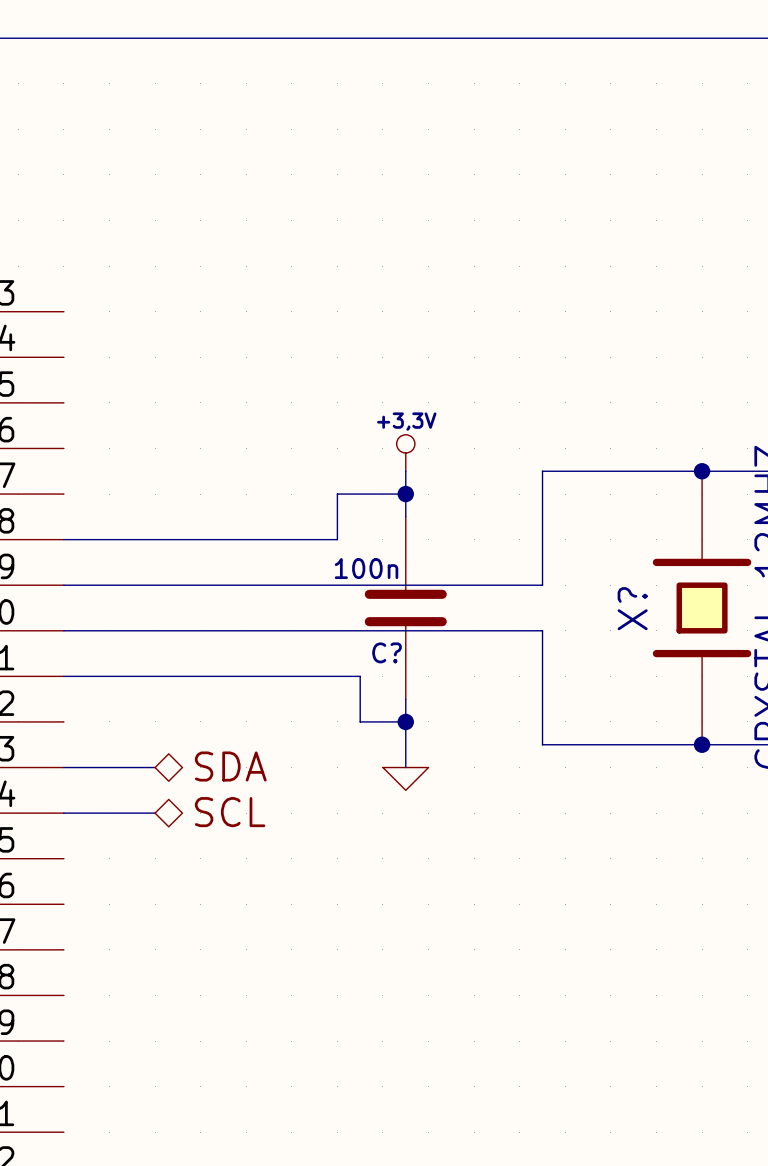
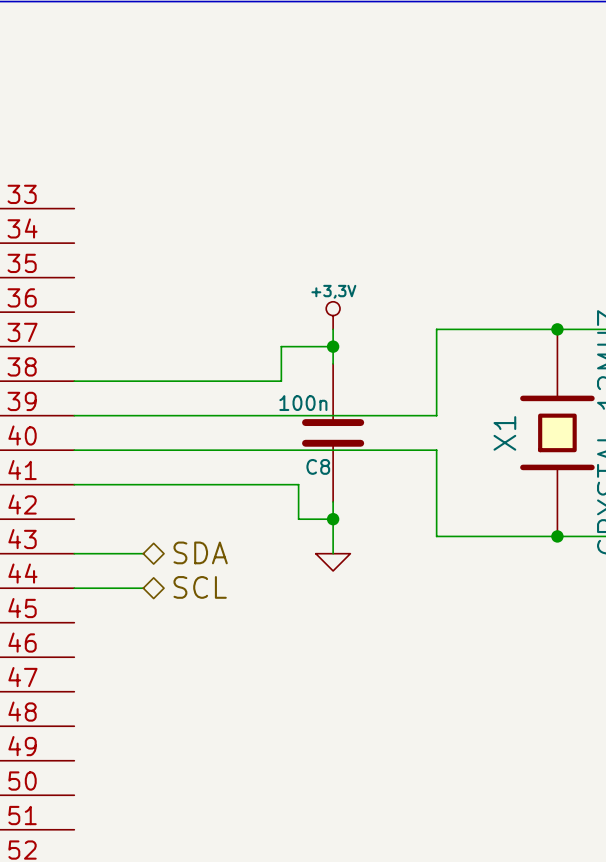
X? name: X? (632, 608) -> X1 (504, 433)
C? name: C? (387, 652) -> C8 (318, 466)

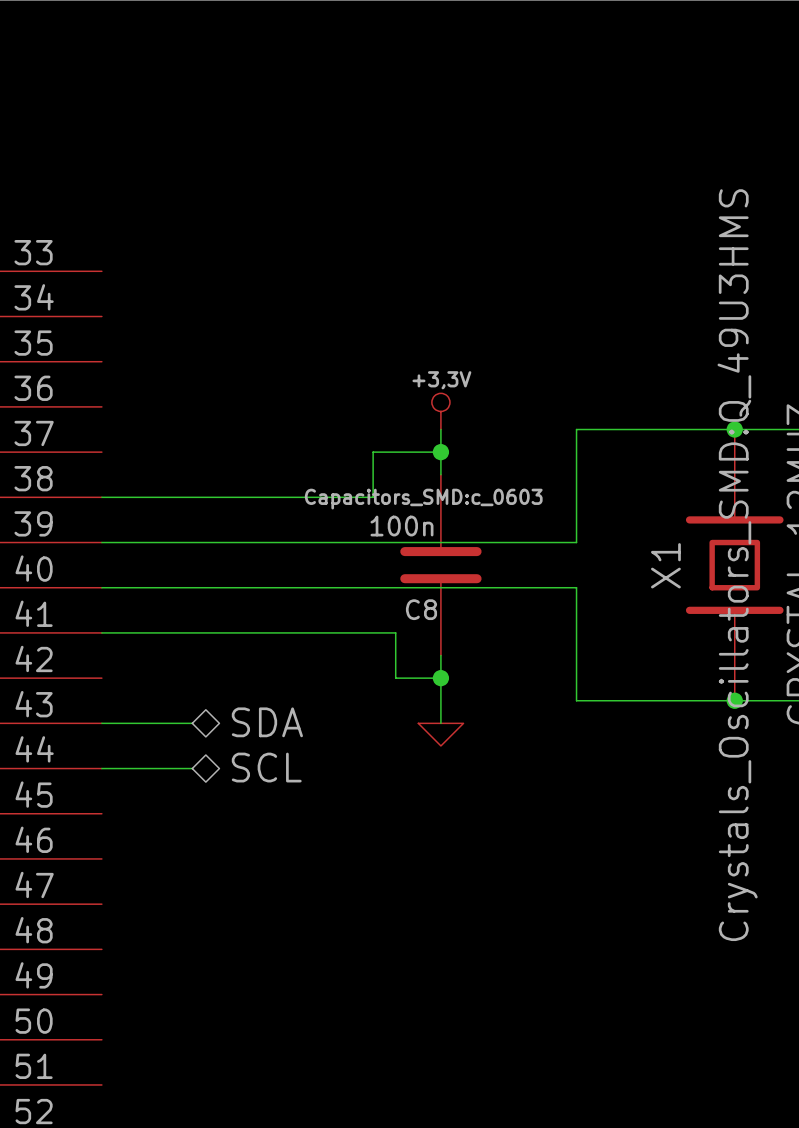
C8 text: none -> Capacitors_SMD:c_0603 (423, 499)
X1 text: none -> Crystals_Oscillators_SMD:Q_49U3HMS (737, 565)

